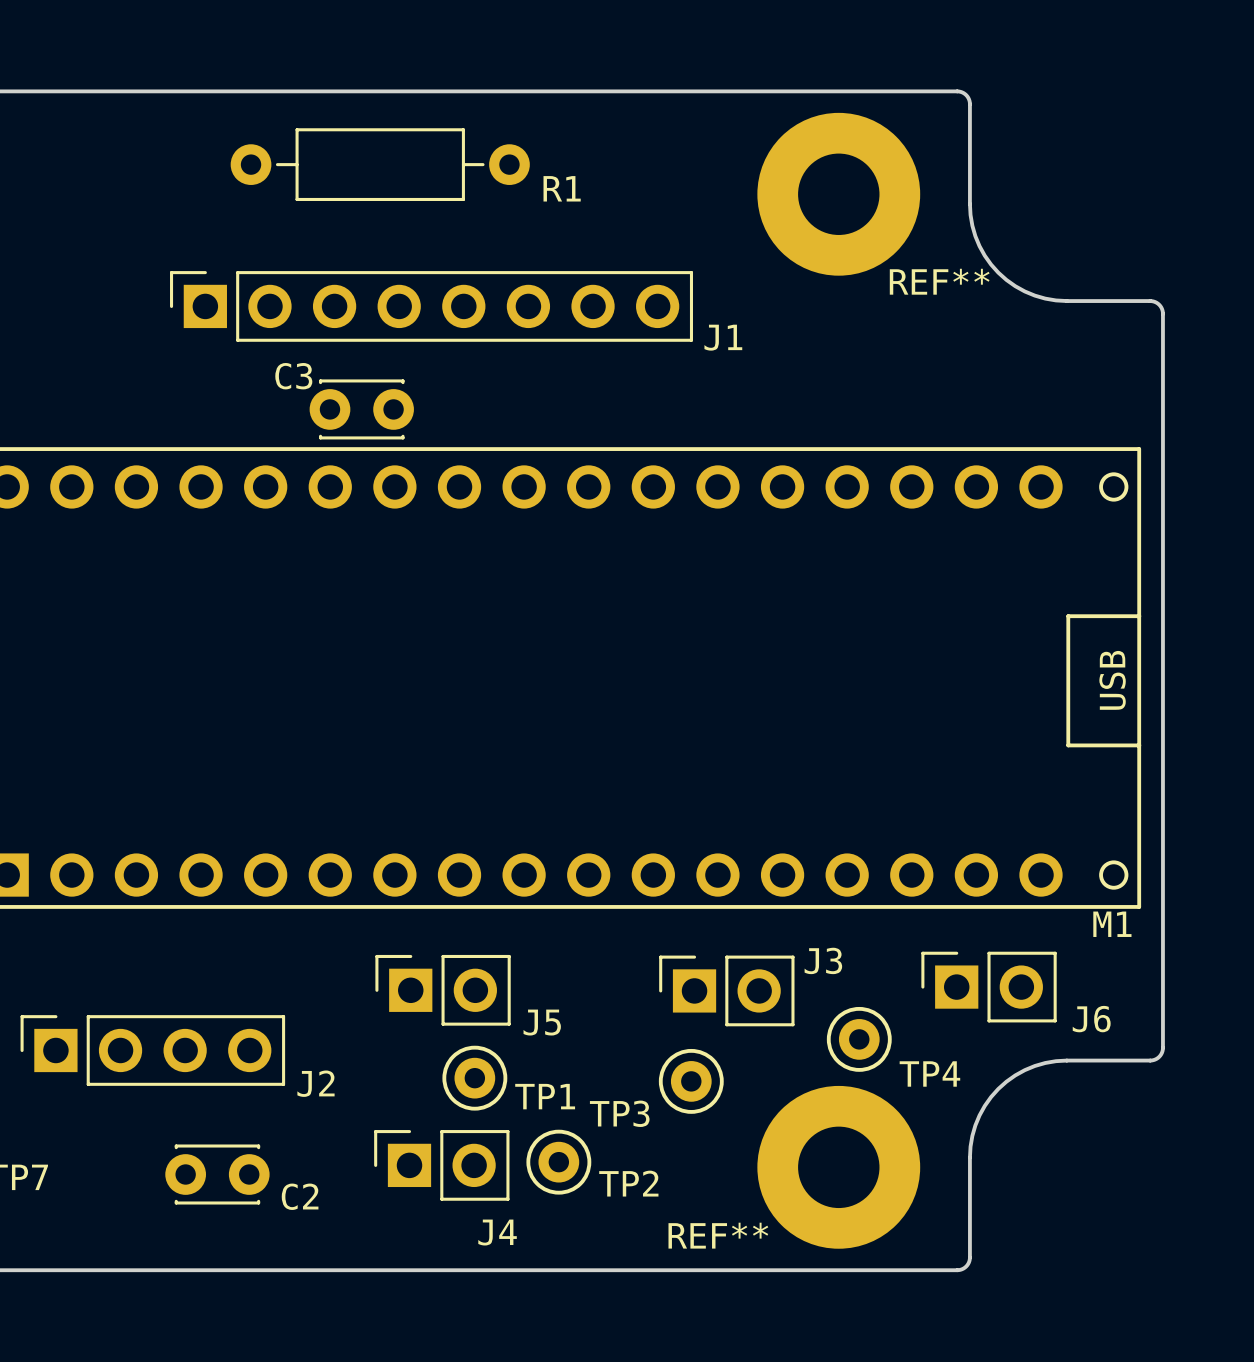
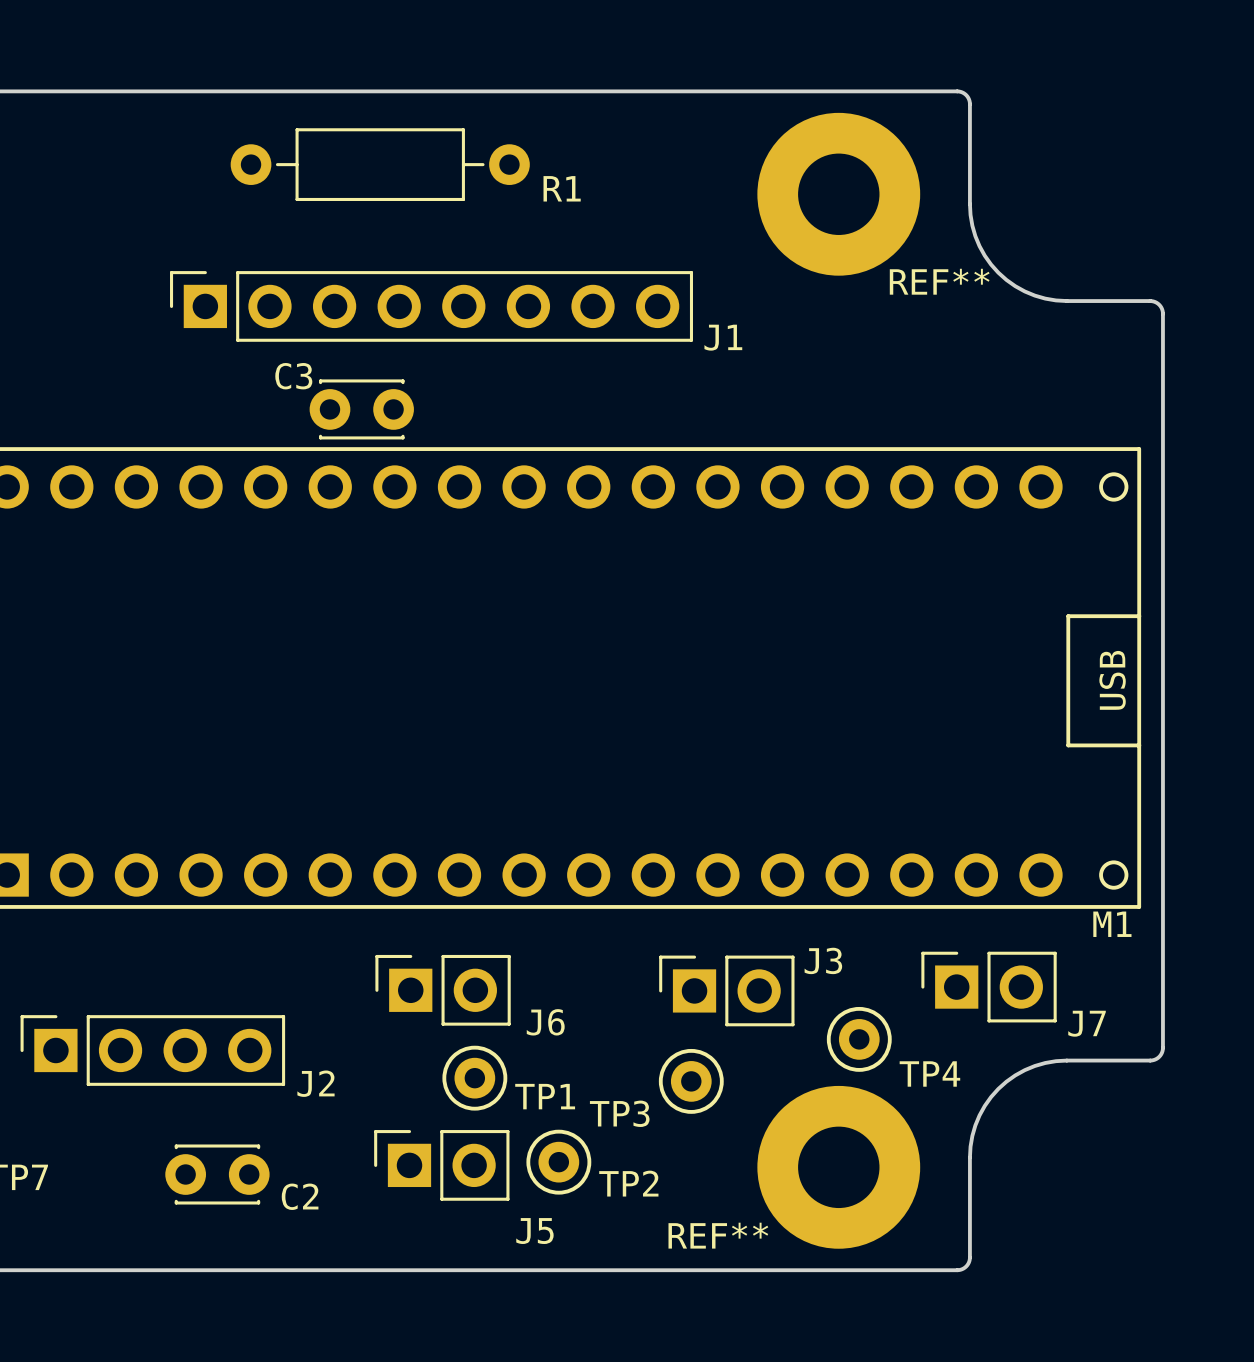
J6 name: J6 (1091, 1019) -> J7 (1087, 1023)
J5 name: J5 (542, 1022) -> J6 (545, 1022)
J4 name: J4 (497, 1232) -> J5 (534, 1231)

